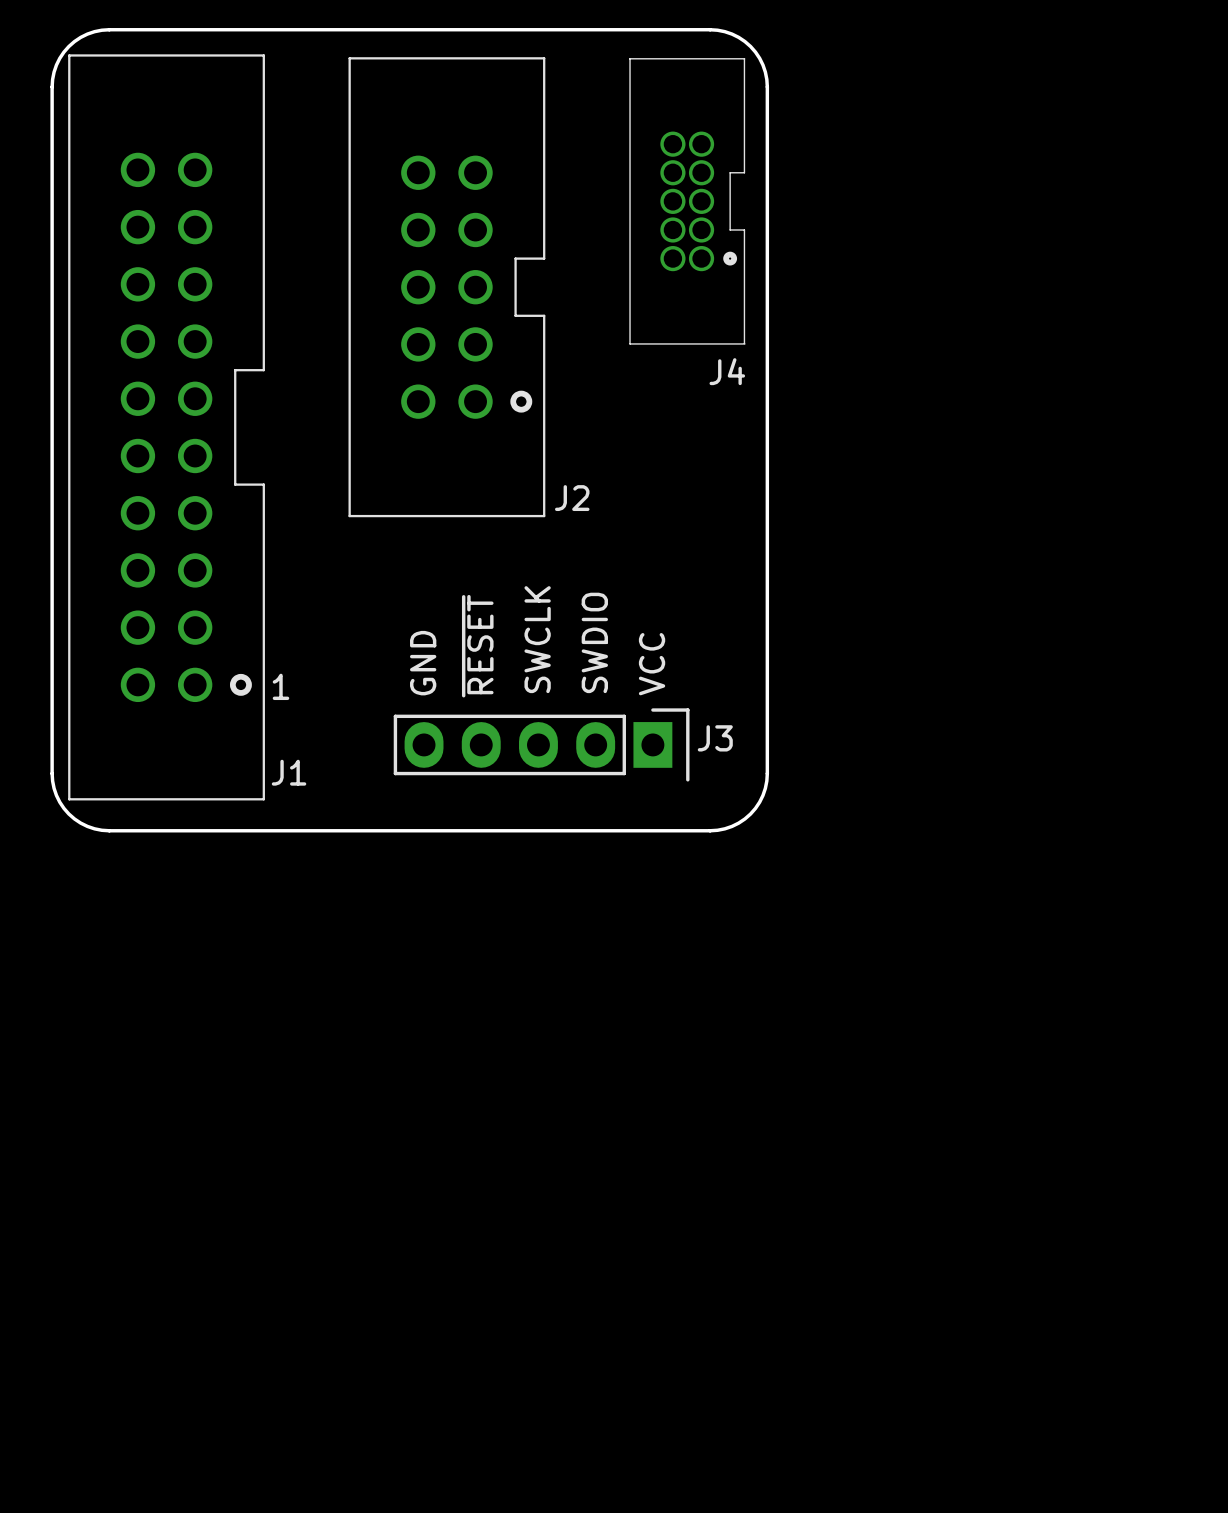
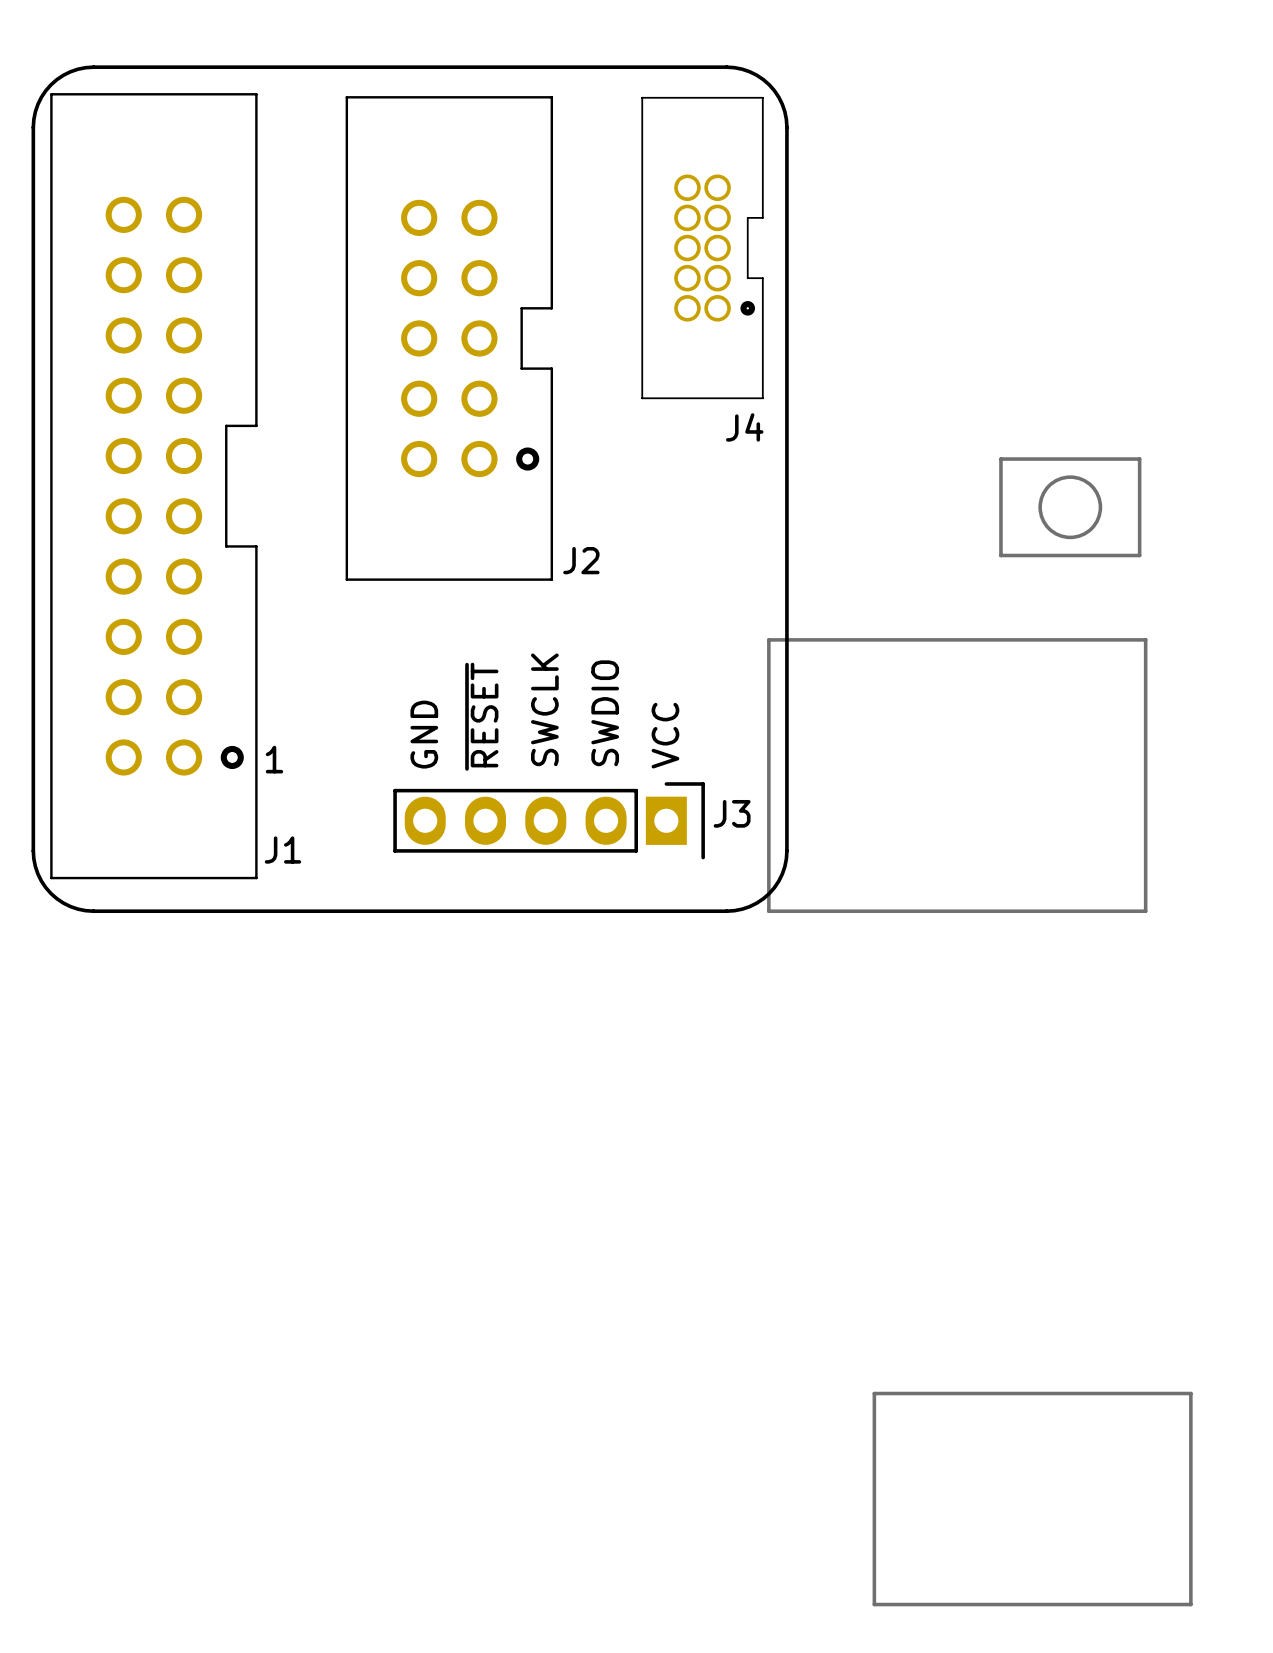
line: none -> (1000, 459) (1000, 555) (1139, 555) (1139, 459) (1000, 459)
drawing: none -> [1038, 475, 1103, 540]
line: none -> (768, 639) (768, 911) (1145, 911) (1145, 639) (768, 639)
line: none -> (874, 1393) (874, 1604) (1190, 1604) (1190, 1393) (874, 1393)

